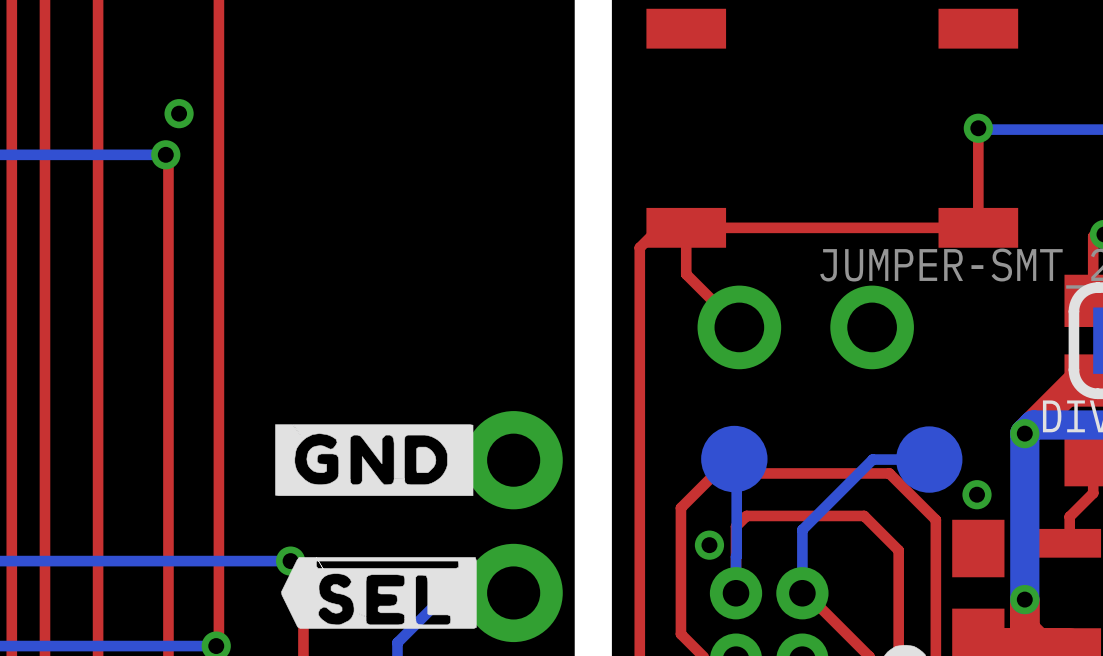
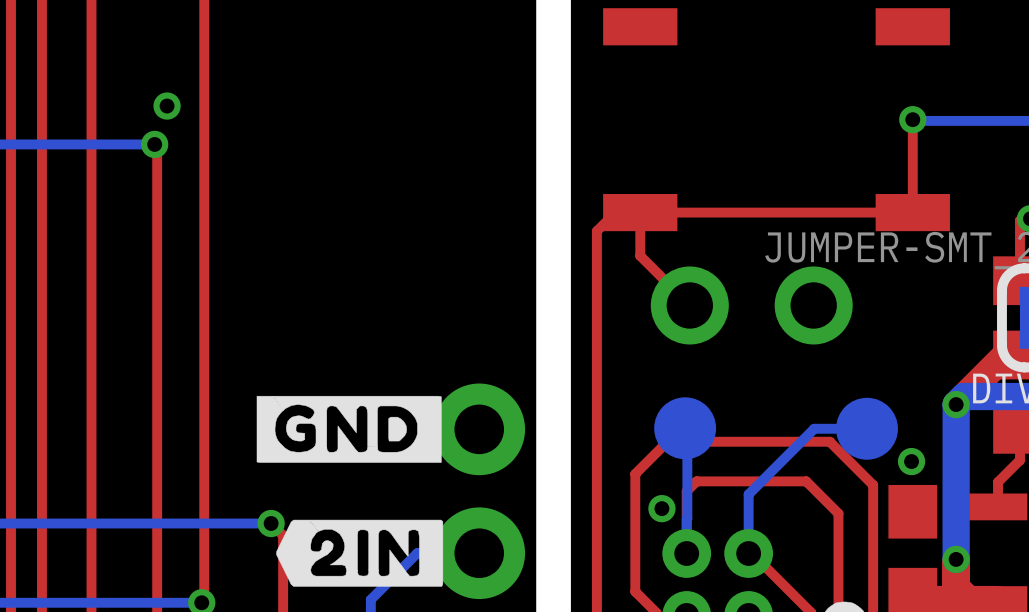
drawing shape: [281, 557, 477, 629] -> [276, 519, 444, 587]

